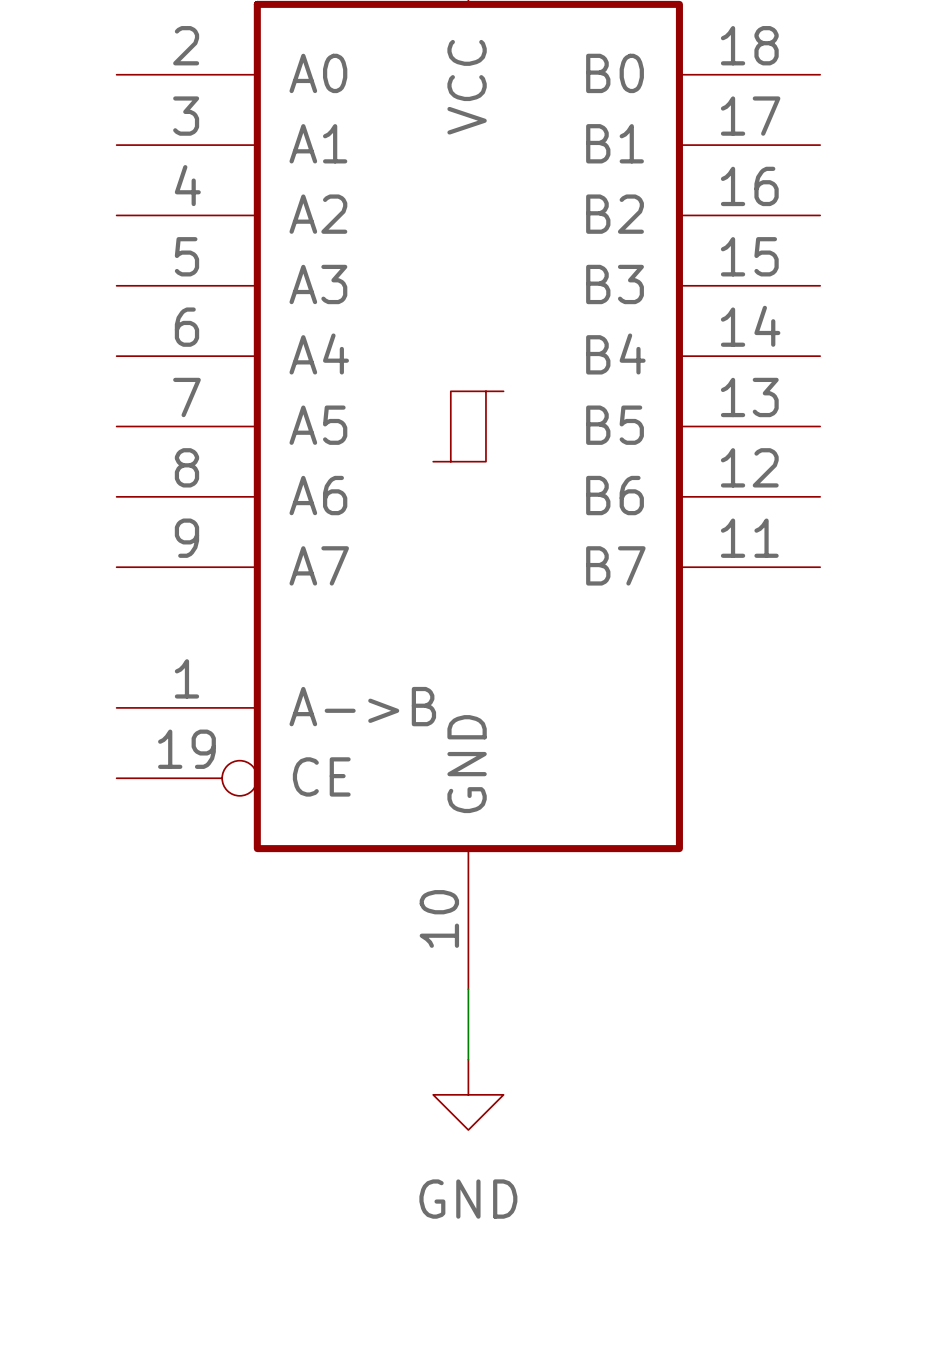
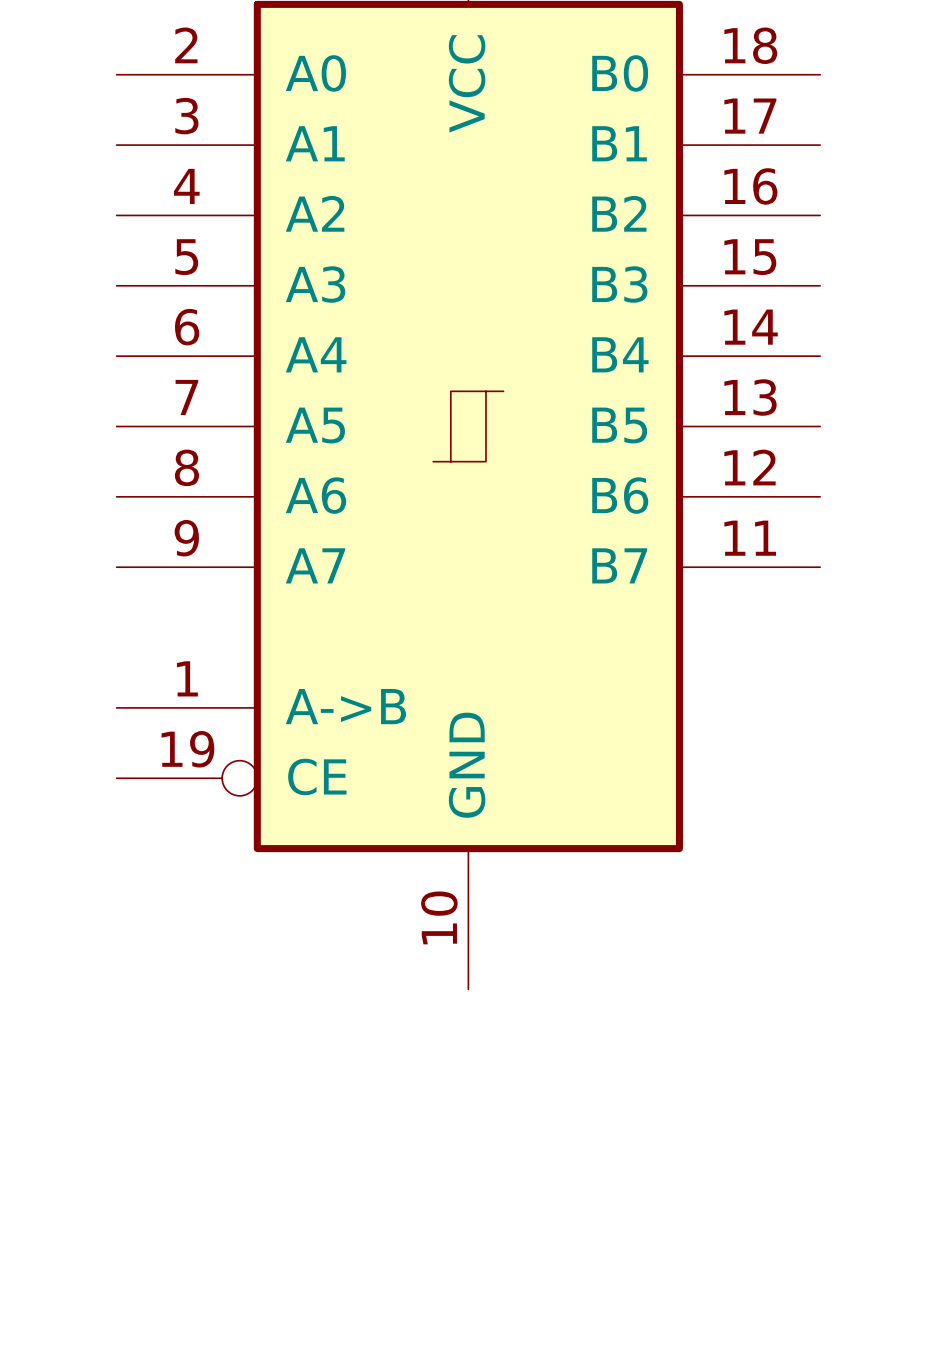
wire: (468, 989) (468, 1059) -> none
power symbol: GND (468, 1094) -> none

